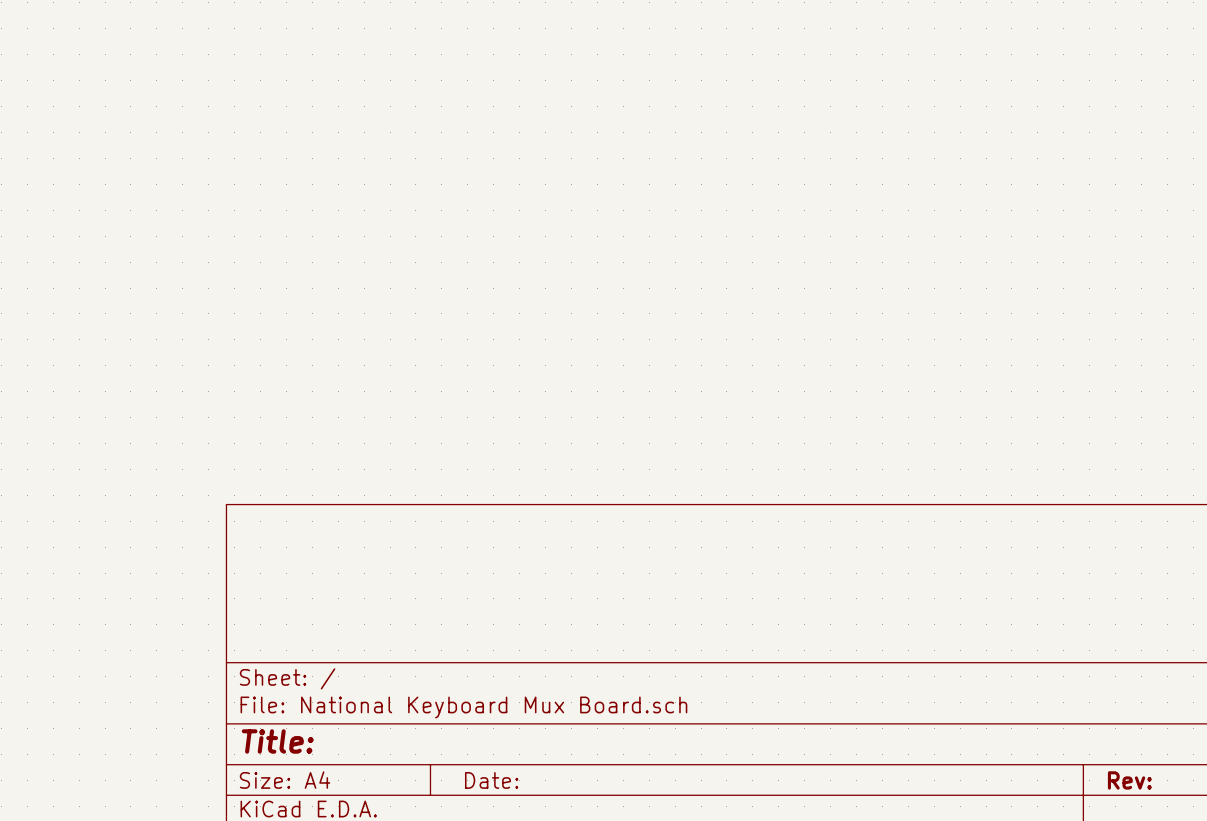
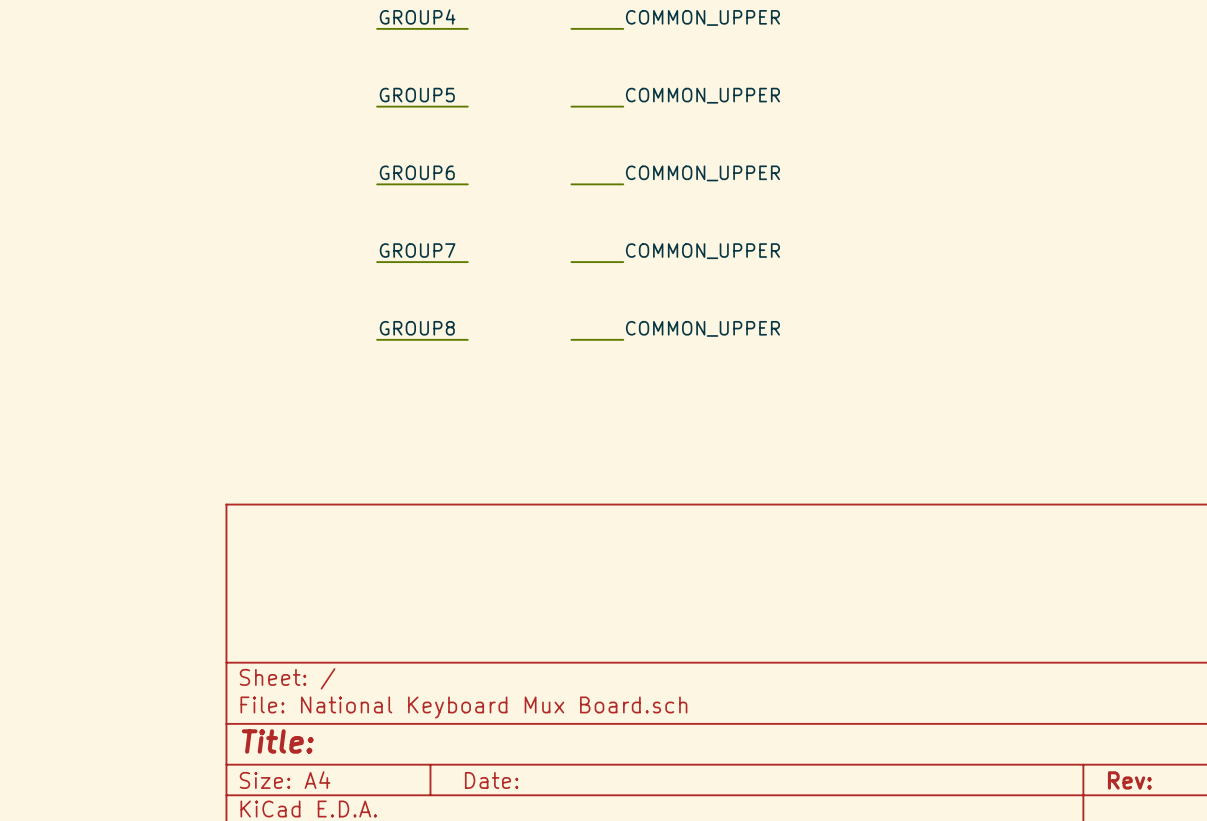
label: none -> GROUP4 (417, 17)
label: none -> COMMON_UPPER (702, 17)
wire: none -> (377, 28) (467, 28)
wire: none -> (571, 28) (623, 28)
label: none -> GROUP5 (417, 95)
label: none -> COMMON_UPPER (702, 95)
wire: none -> (377, 106) (467, 106)
wire: none -> (571, 106) (623, 106)
label: none -> GROUP6 (417, 172)
label: none -> COMMON_UPPER (702, 173)
wire: none -> (377, 184) (467, 184)
wire: none -> (571, 184) (623, 184)
label: none -> GROUP7 (417, 250)
label: none -> COMMON_UPPER (702, 251)
wire: none -> (377, 262) (467, 262)
wire: none -> (571, 262) (623, 262)
label: none -> GROUP8 (417, 328)
label: none -> COMMON_UPPER (702, 328)
wire: none -> (377, 339) (467, 339)
wire: none -> (571, 339) (623, 339)

